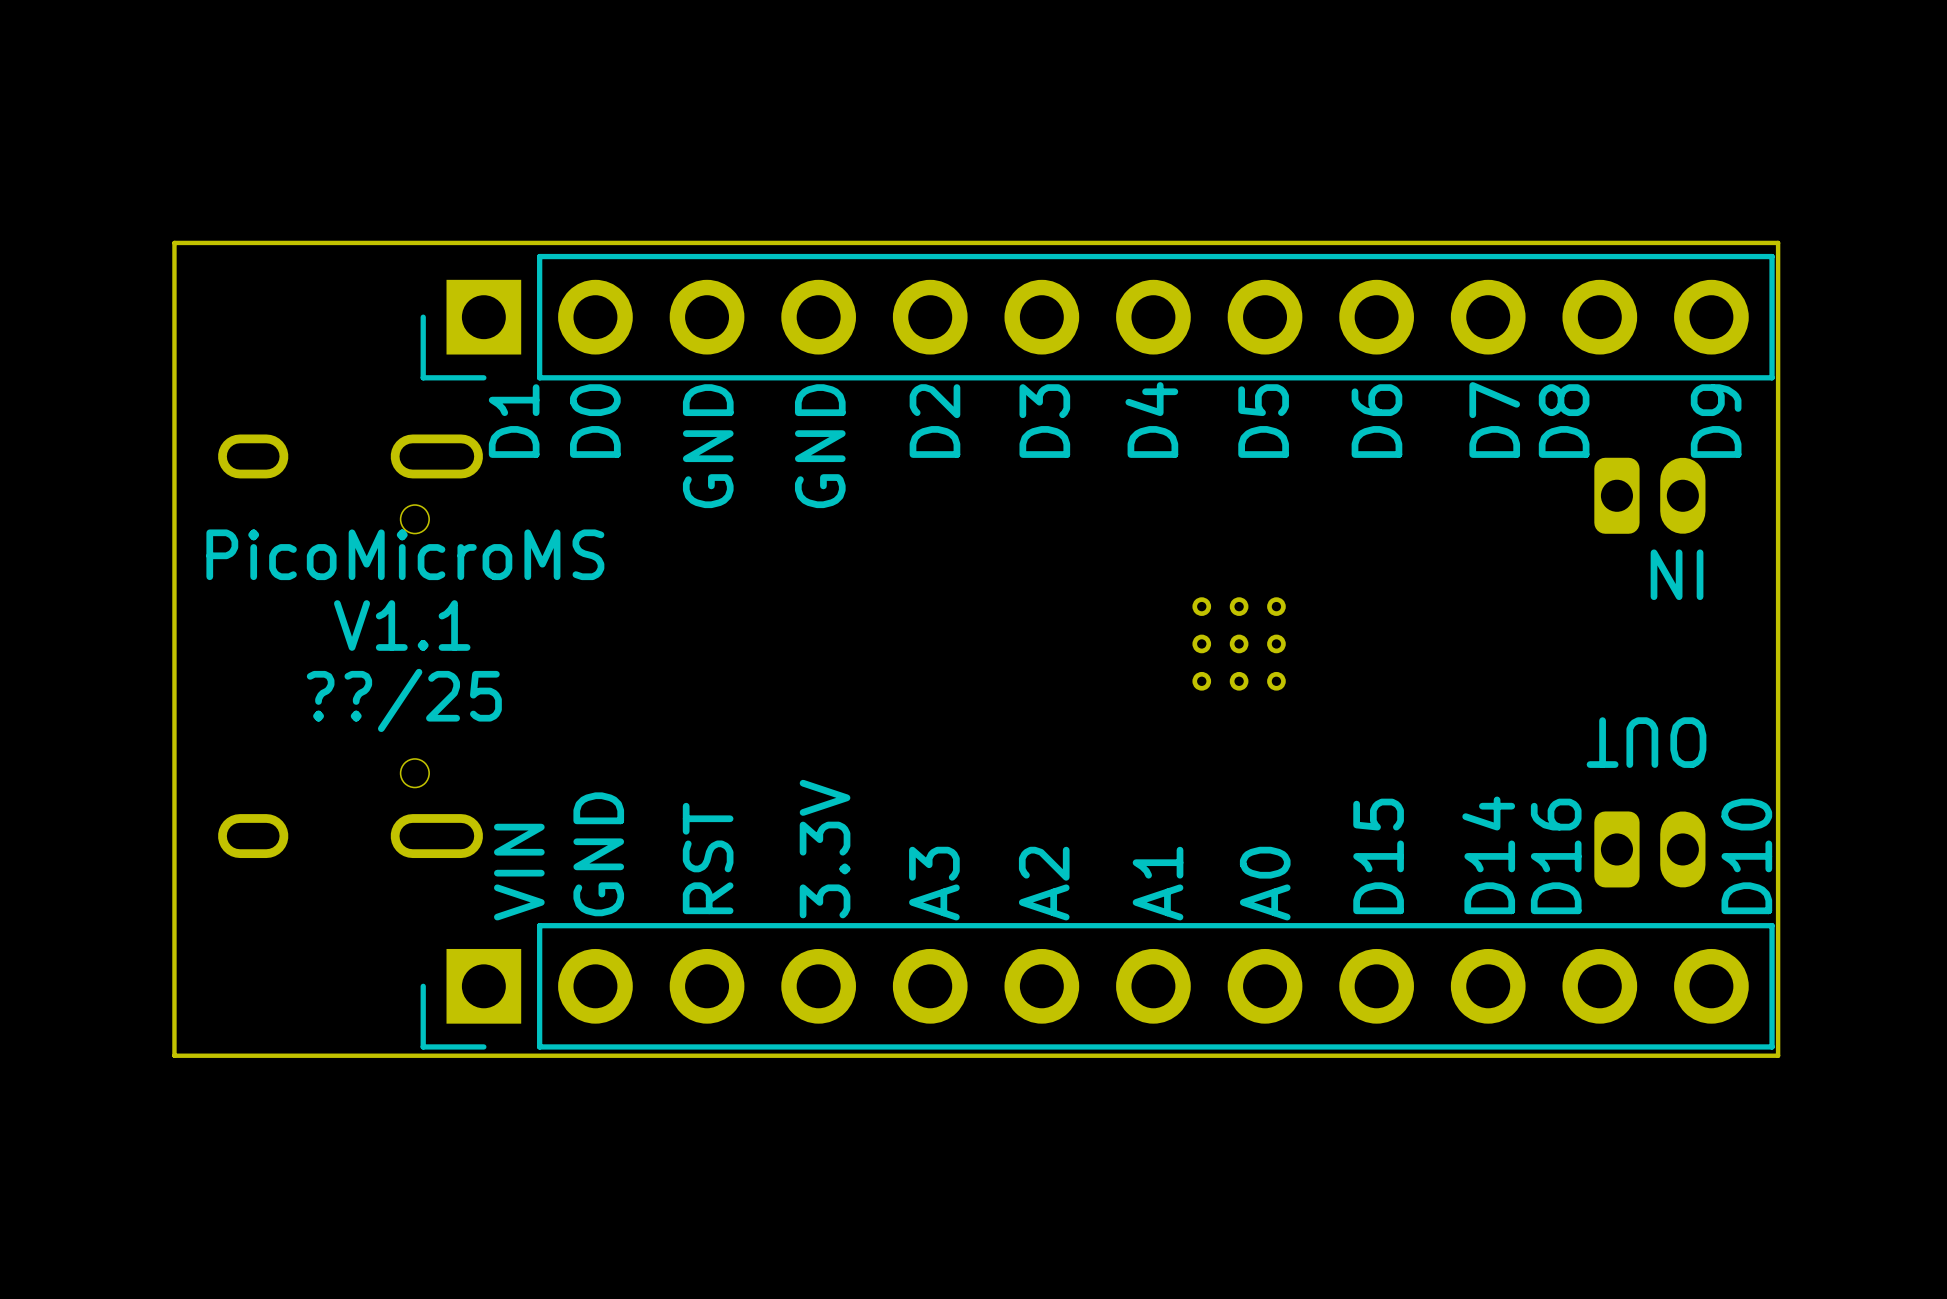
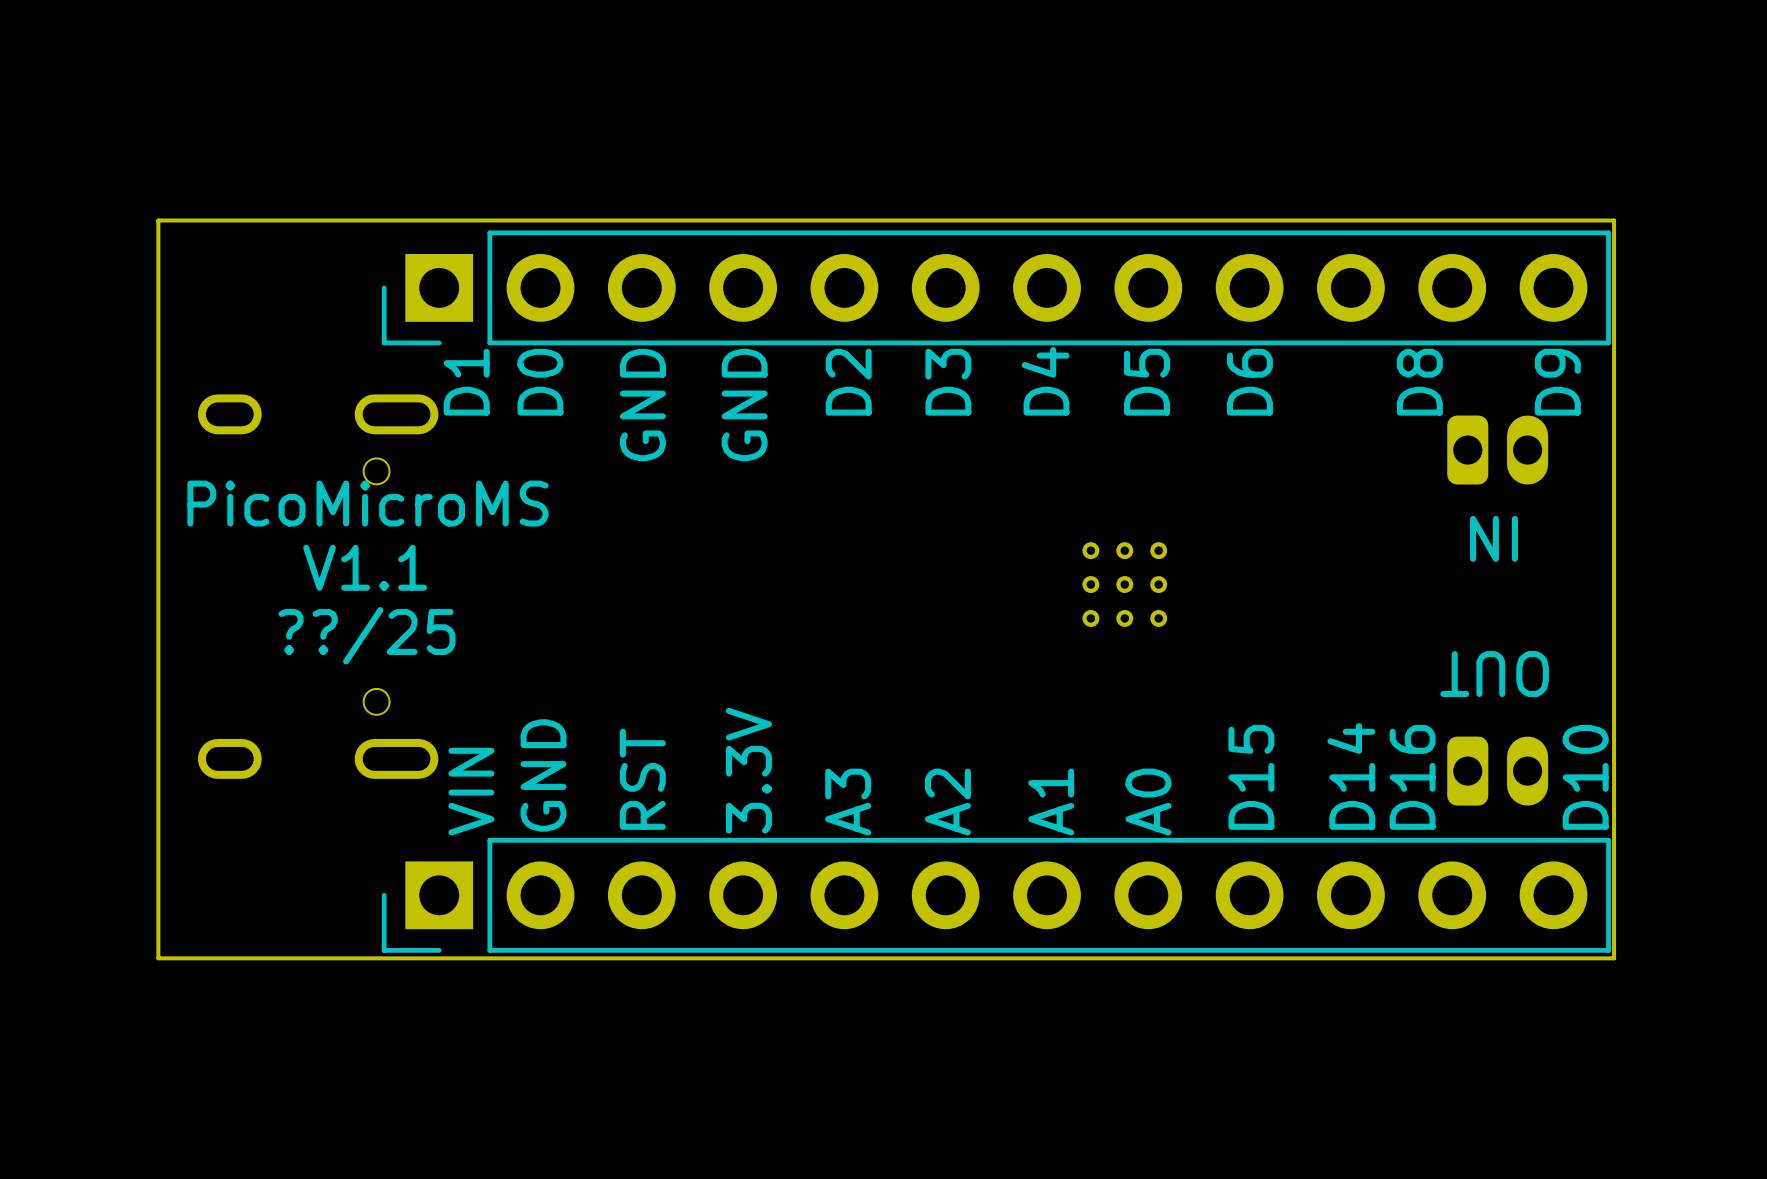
text: D7 (1494, 420) -> none
text position: IN (1677, 574) -> IN (1493, 538)

